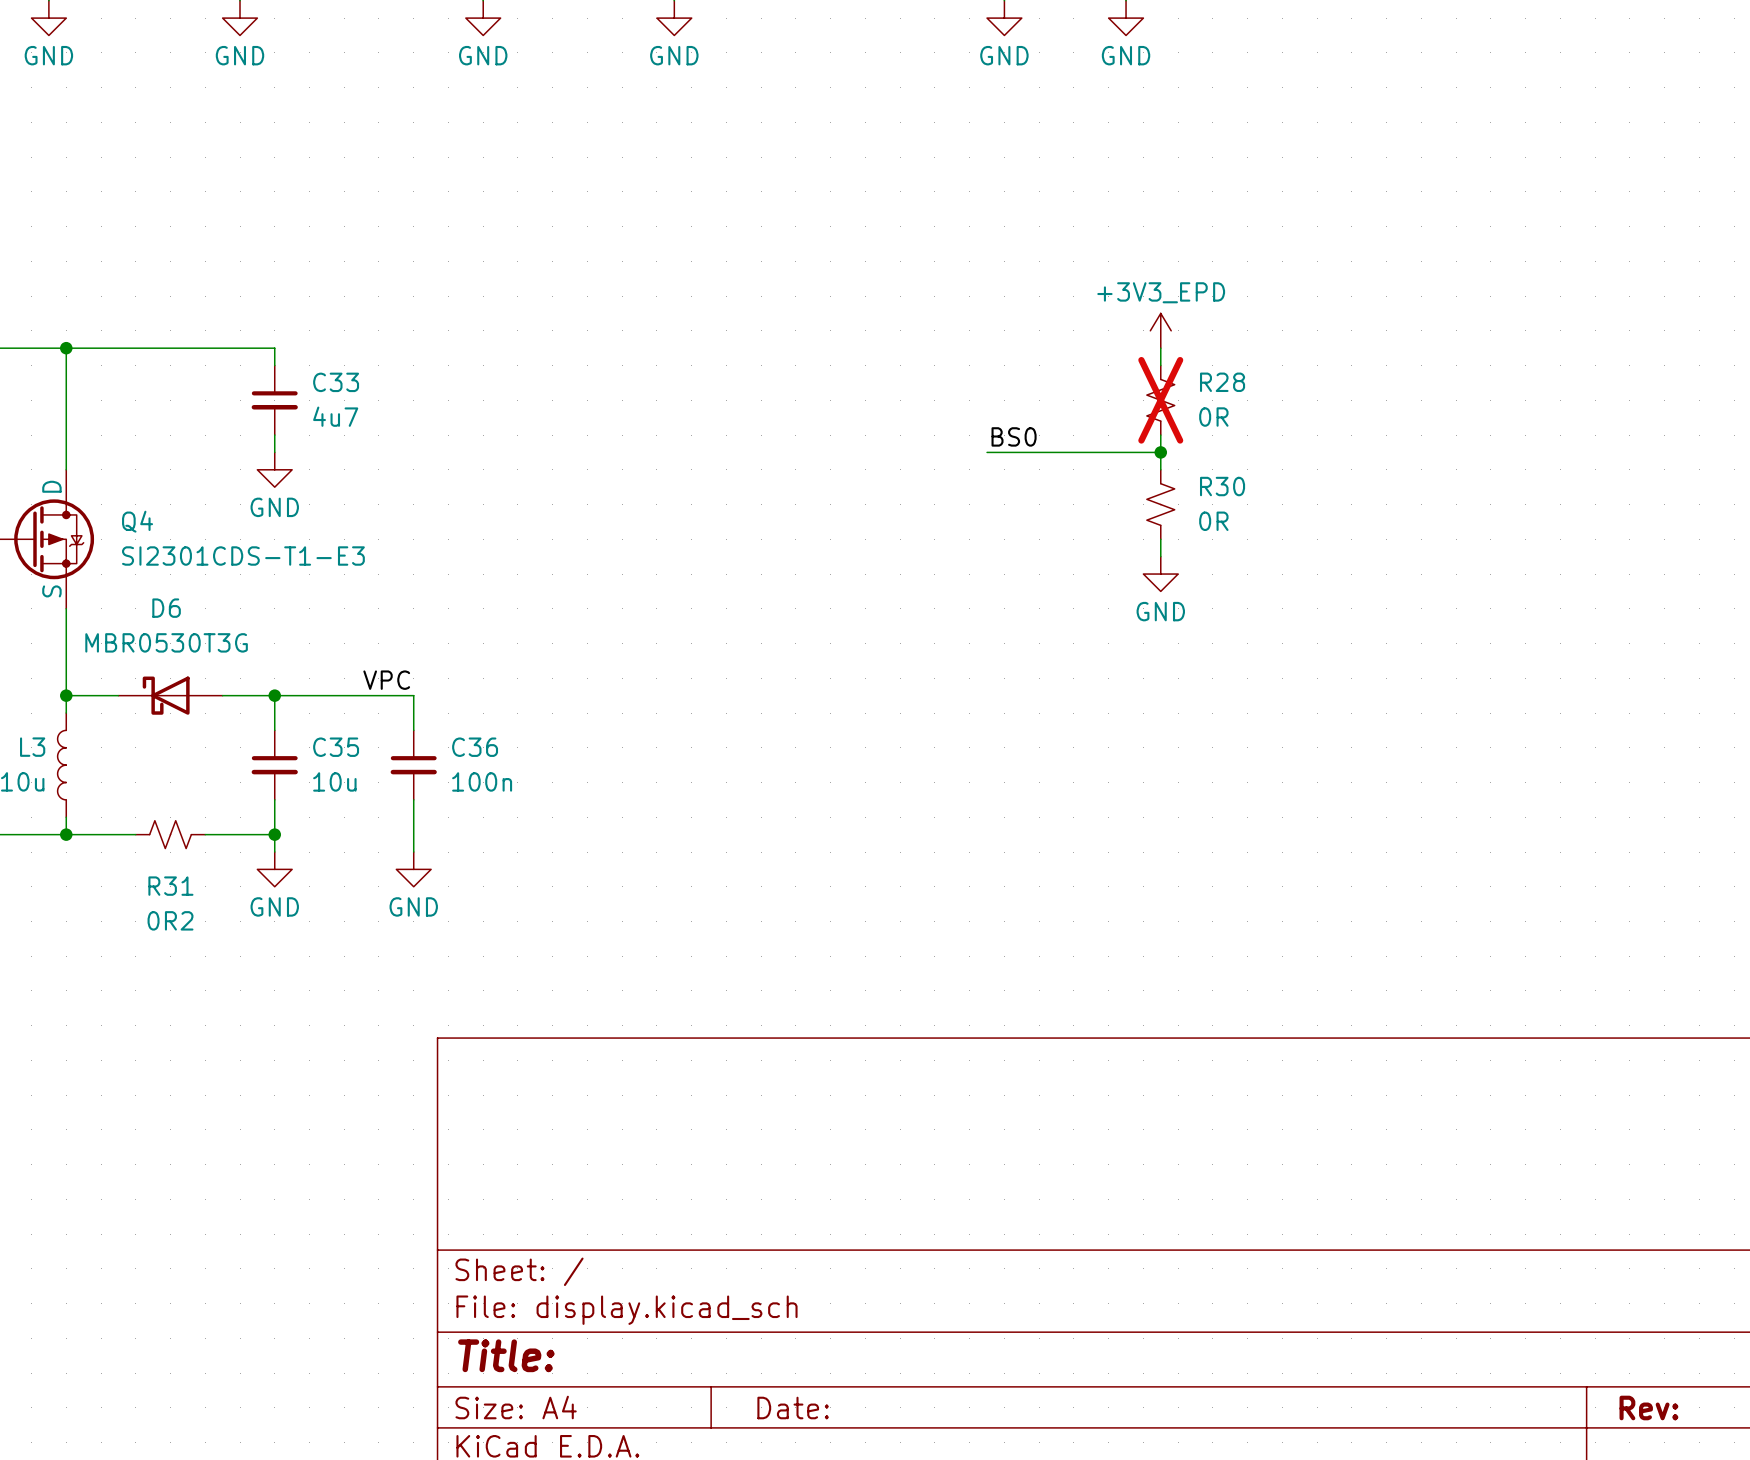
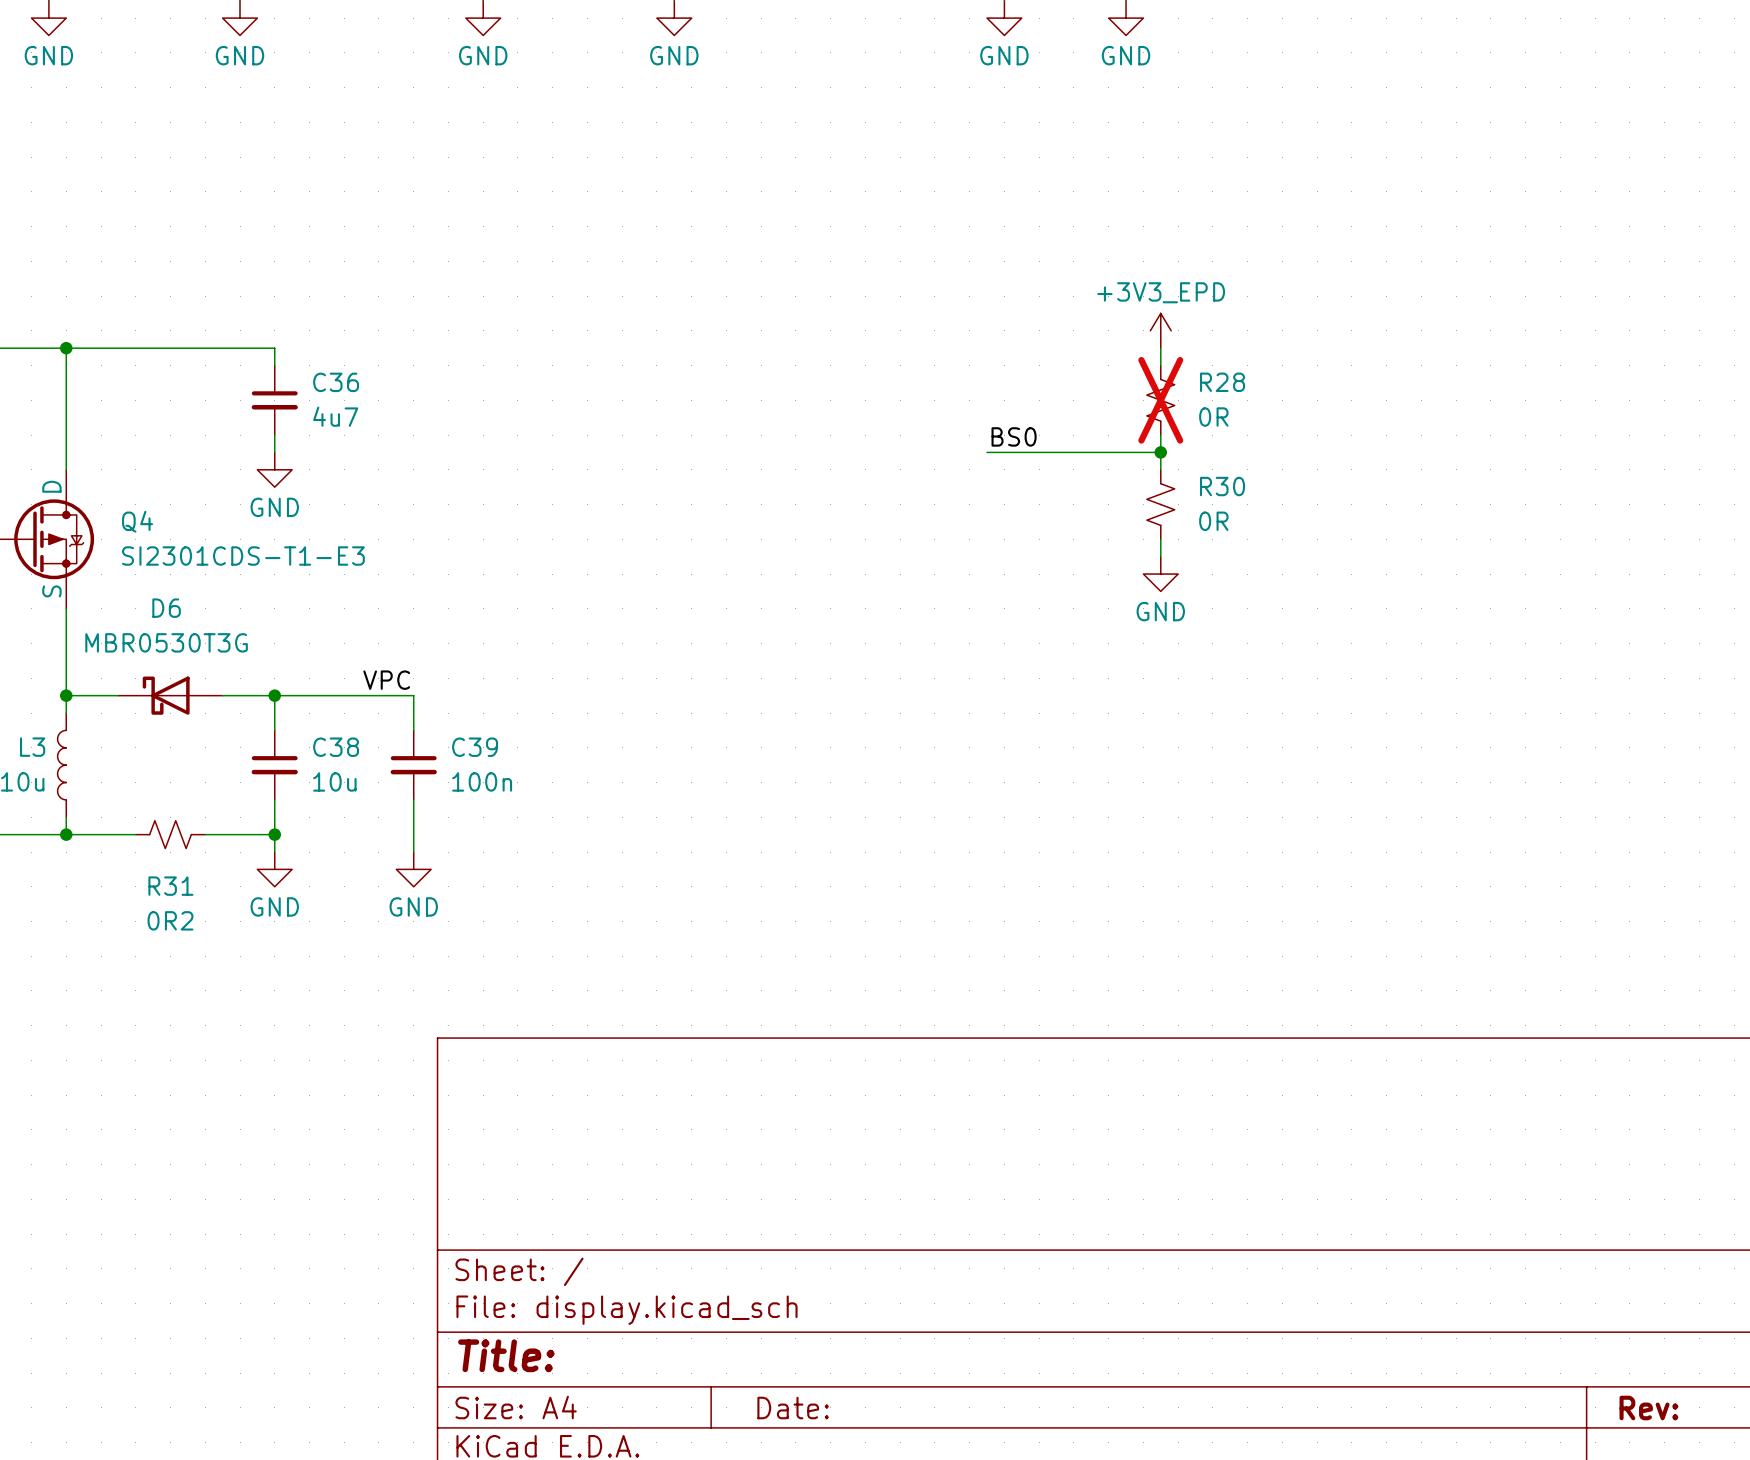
C33 name: C33 (336, 382) -> C36 (336, 382)
C35 name: C35 (336, 747) -> C38 (336, 747)
C36 name: C36 (475, 747) -> C39 (475, 747)

